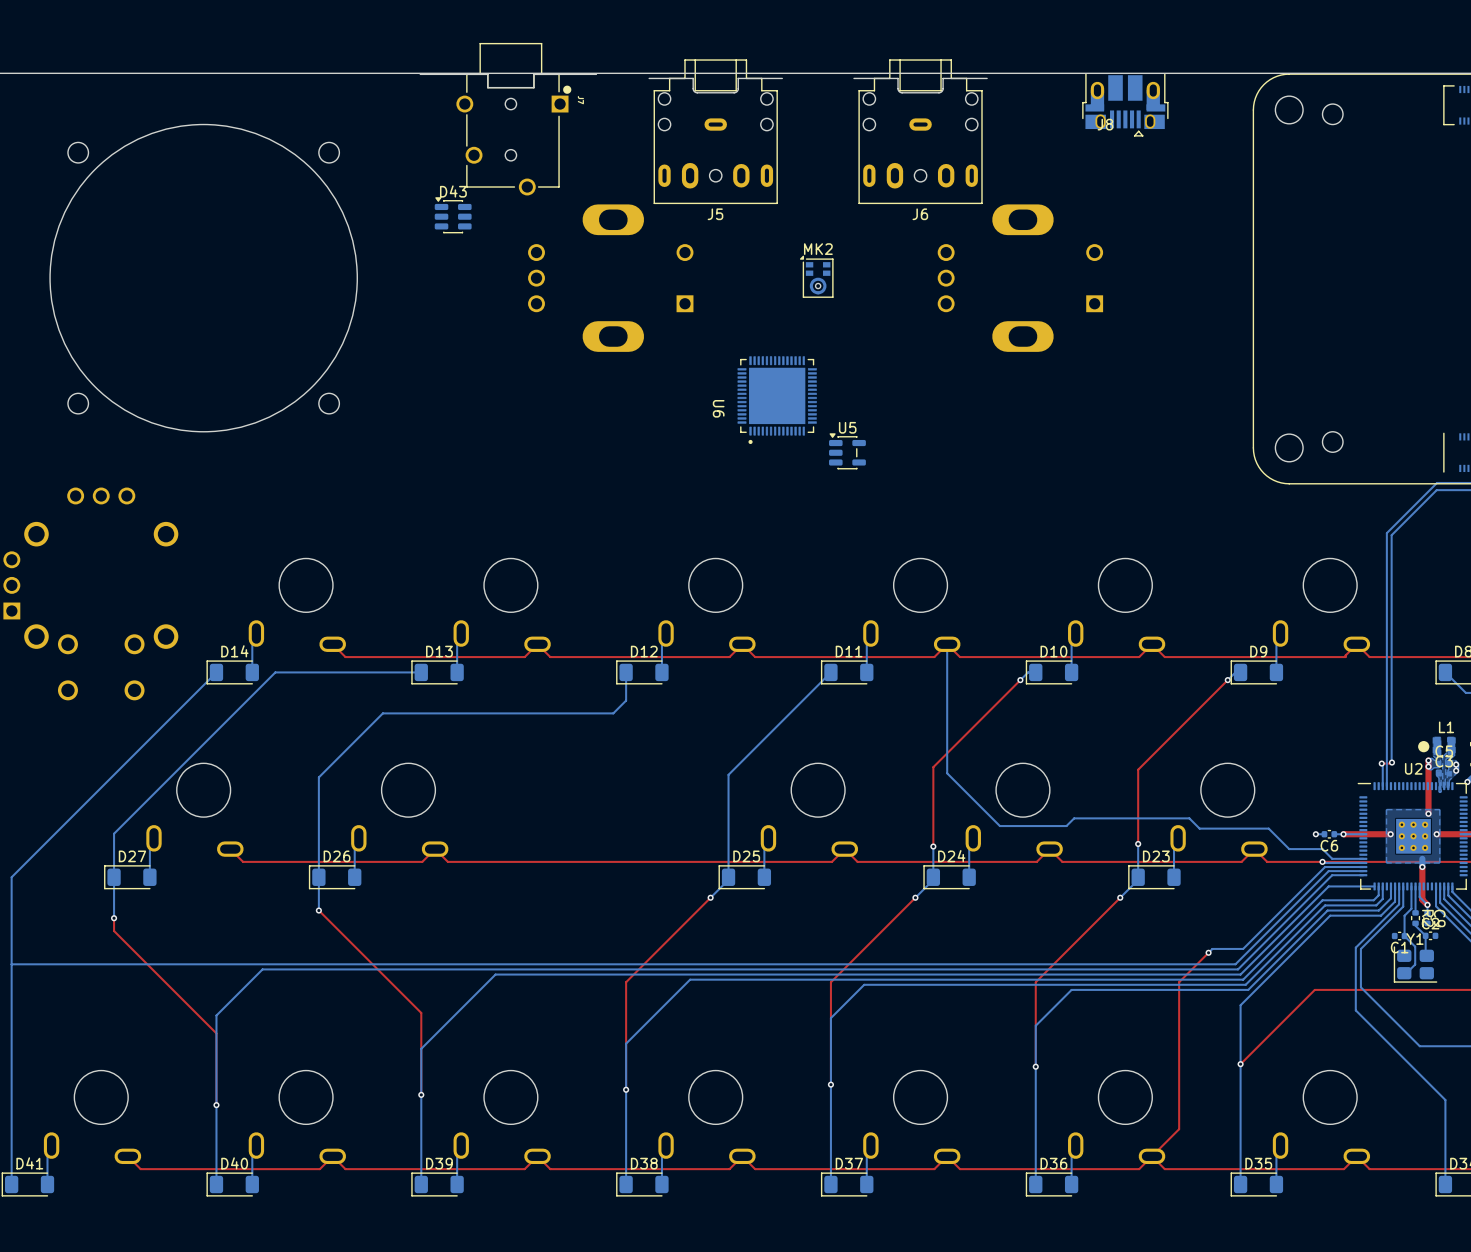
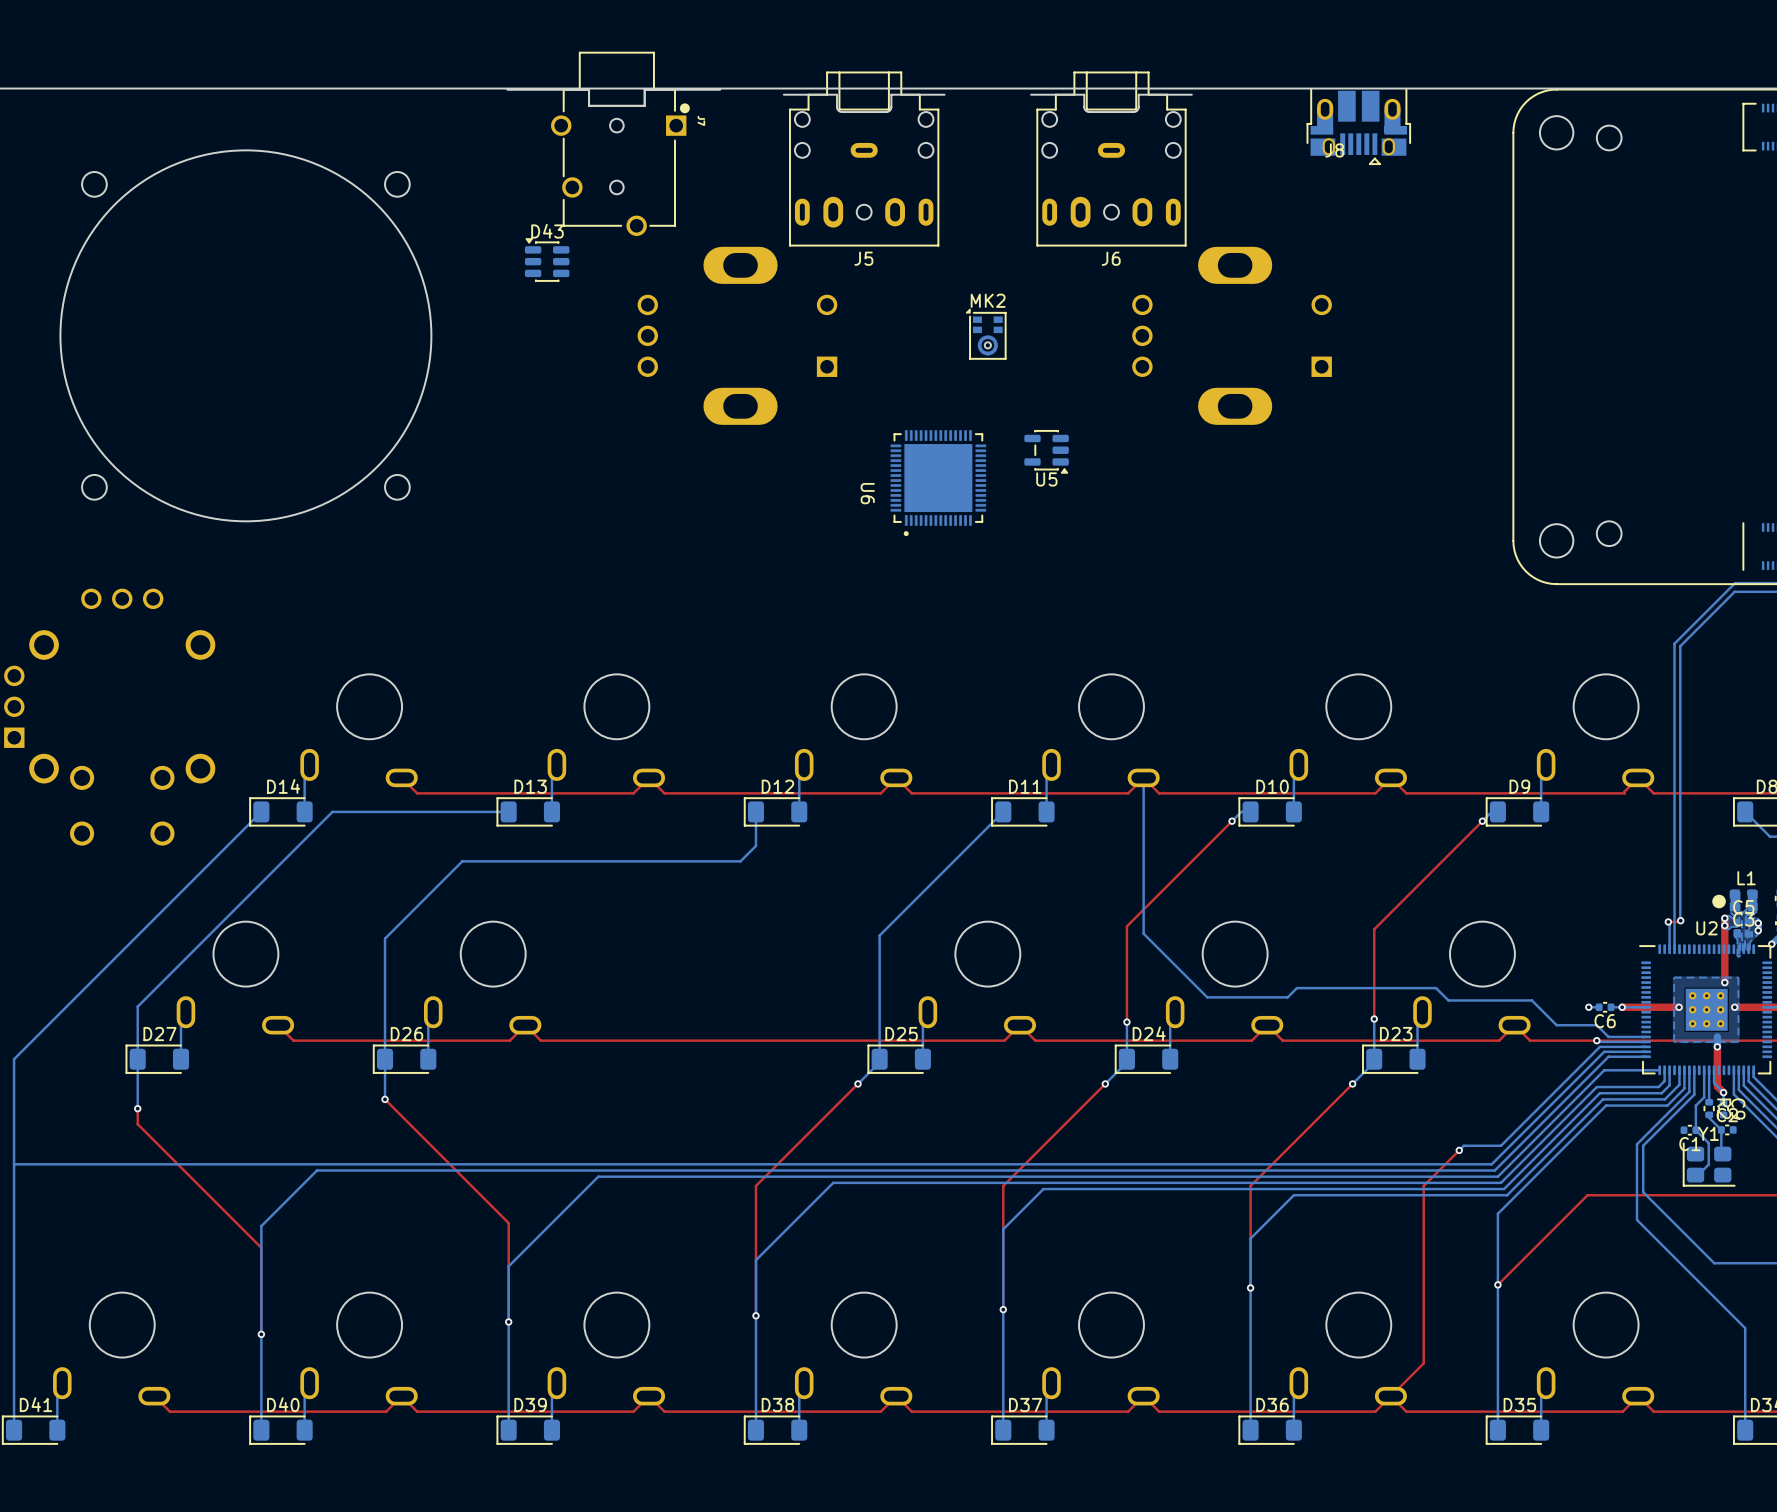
U5 rotation: 0° (847, 451) -> 180° (1046, 451)
U5 position: (847, 451) -> (1046, 451)

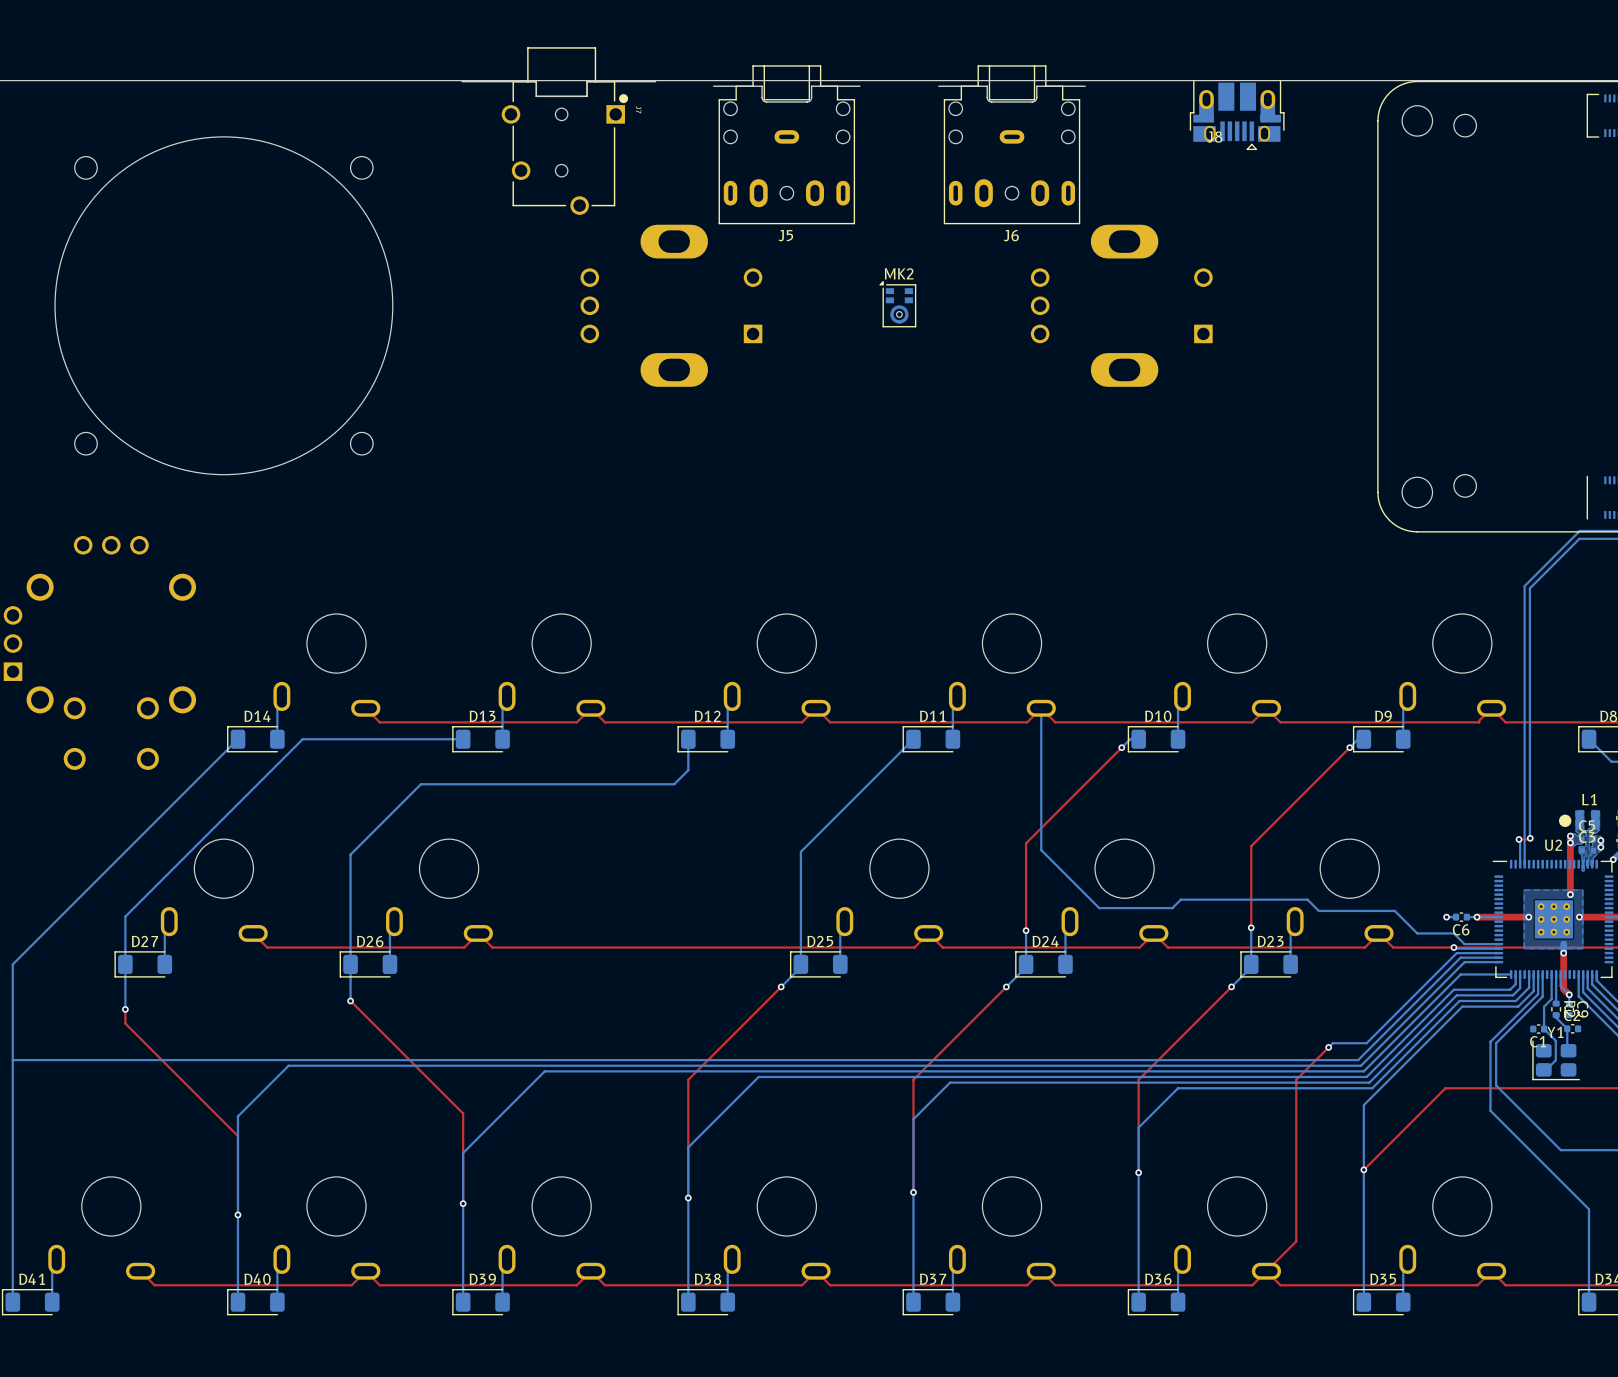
D43: (547, 259) -> none
U5: (1046, 451) -> none
U6: (938, 483) -> none

